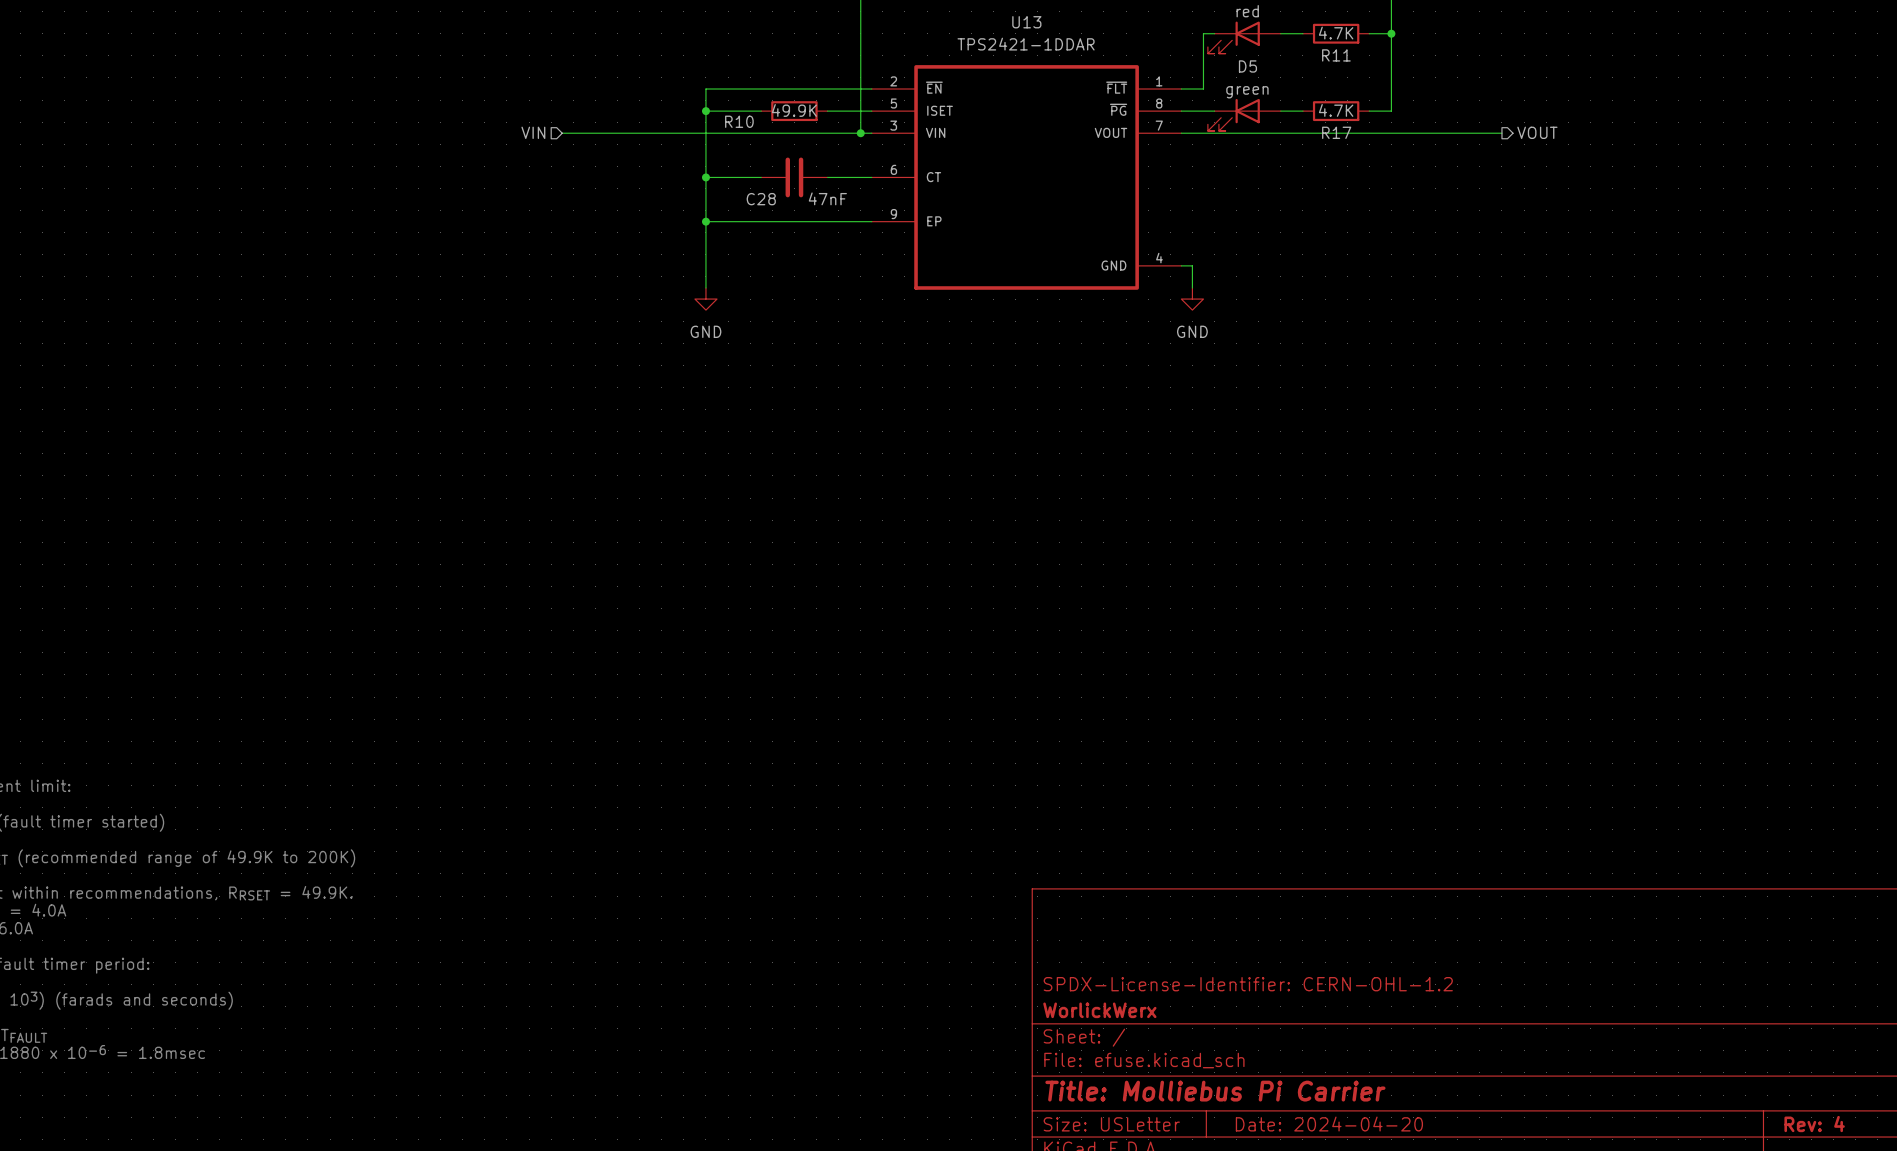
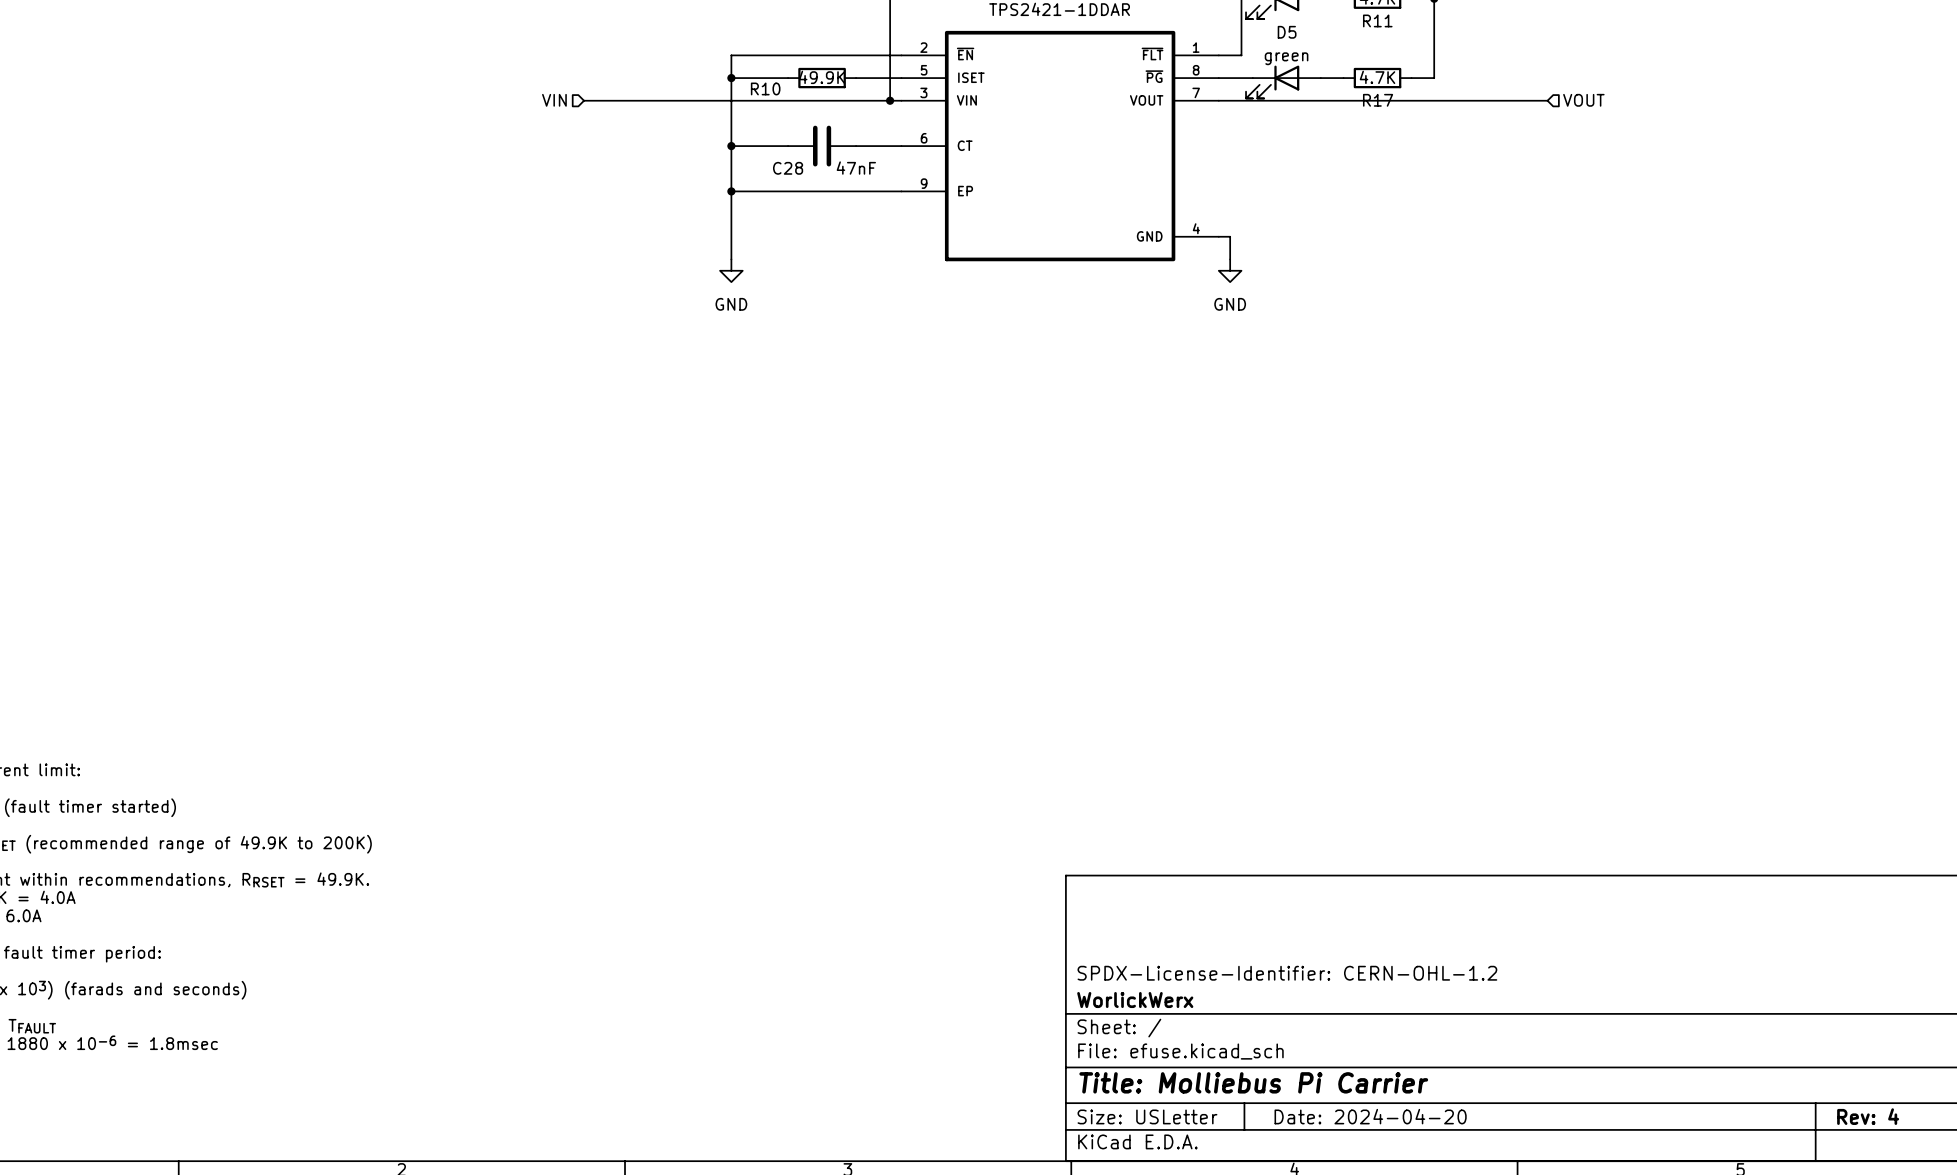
hierarchical label shape: output (1537, 132) -> input (1583, 100)

